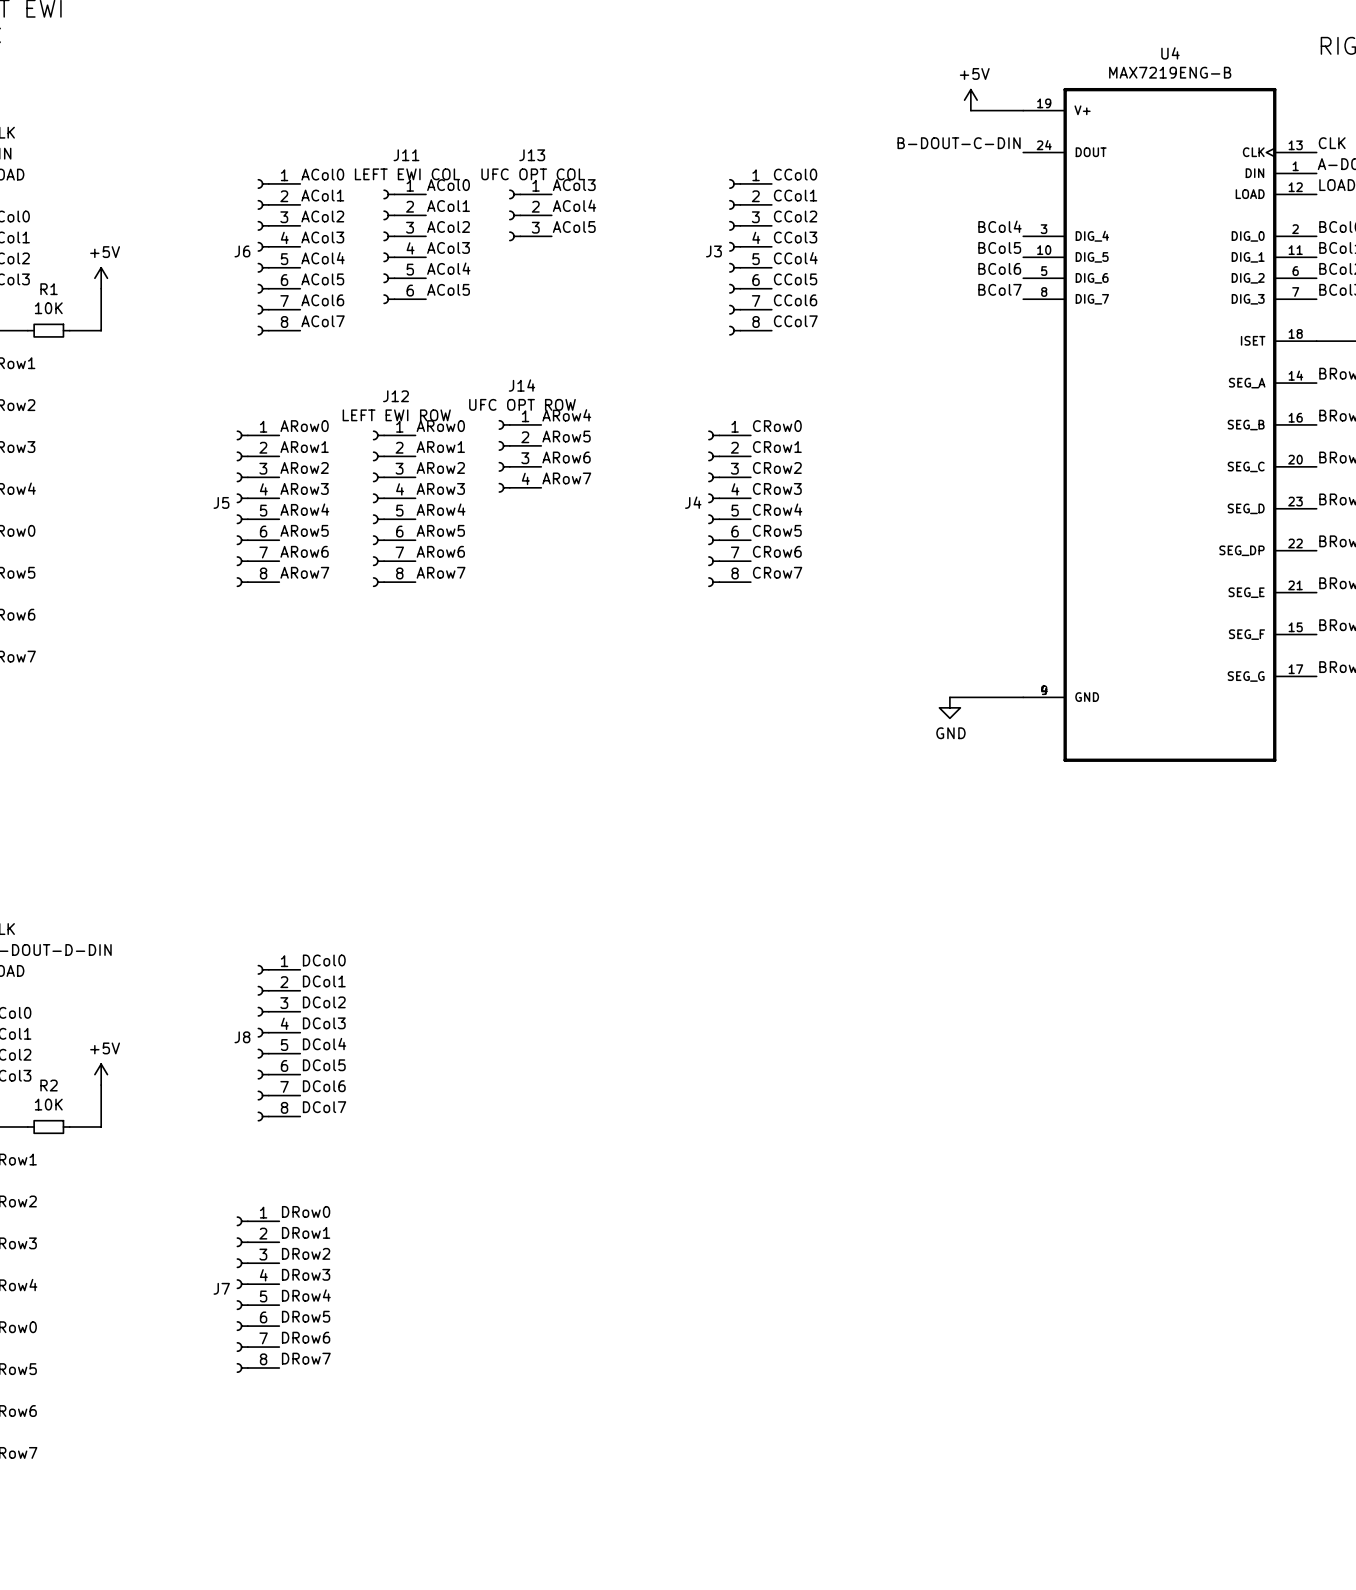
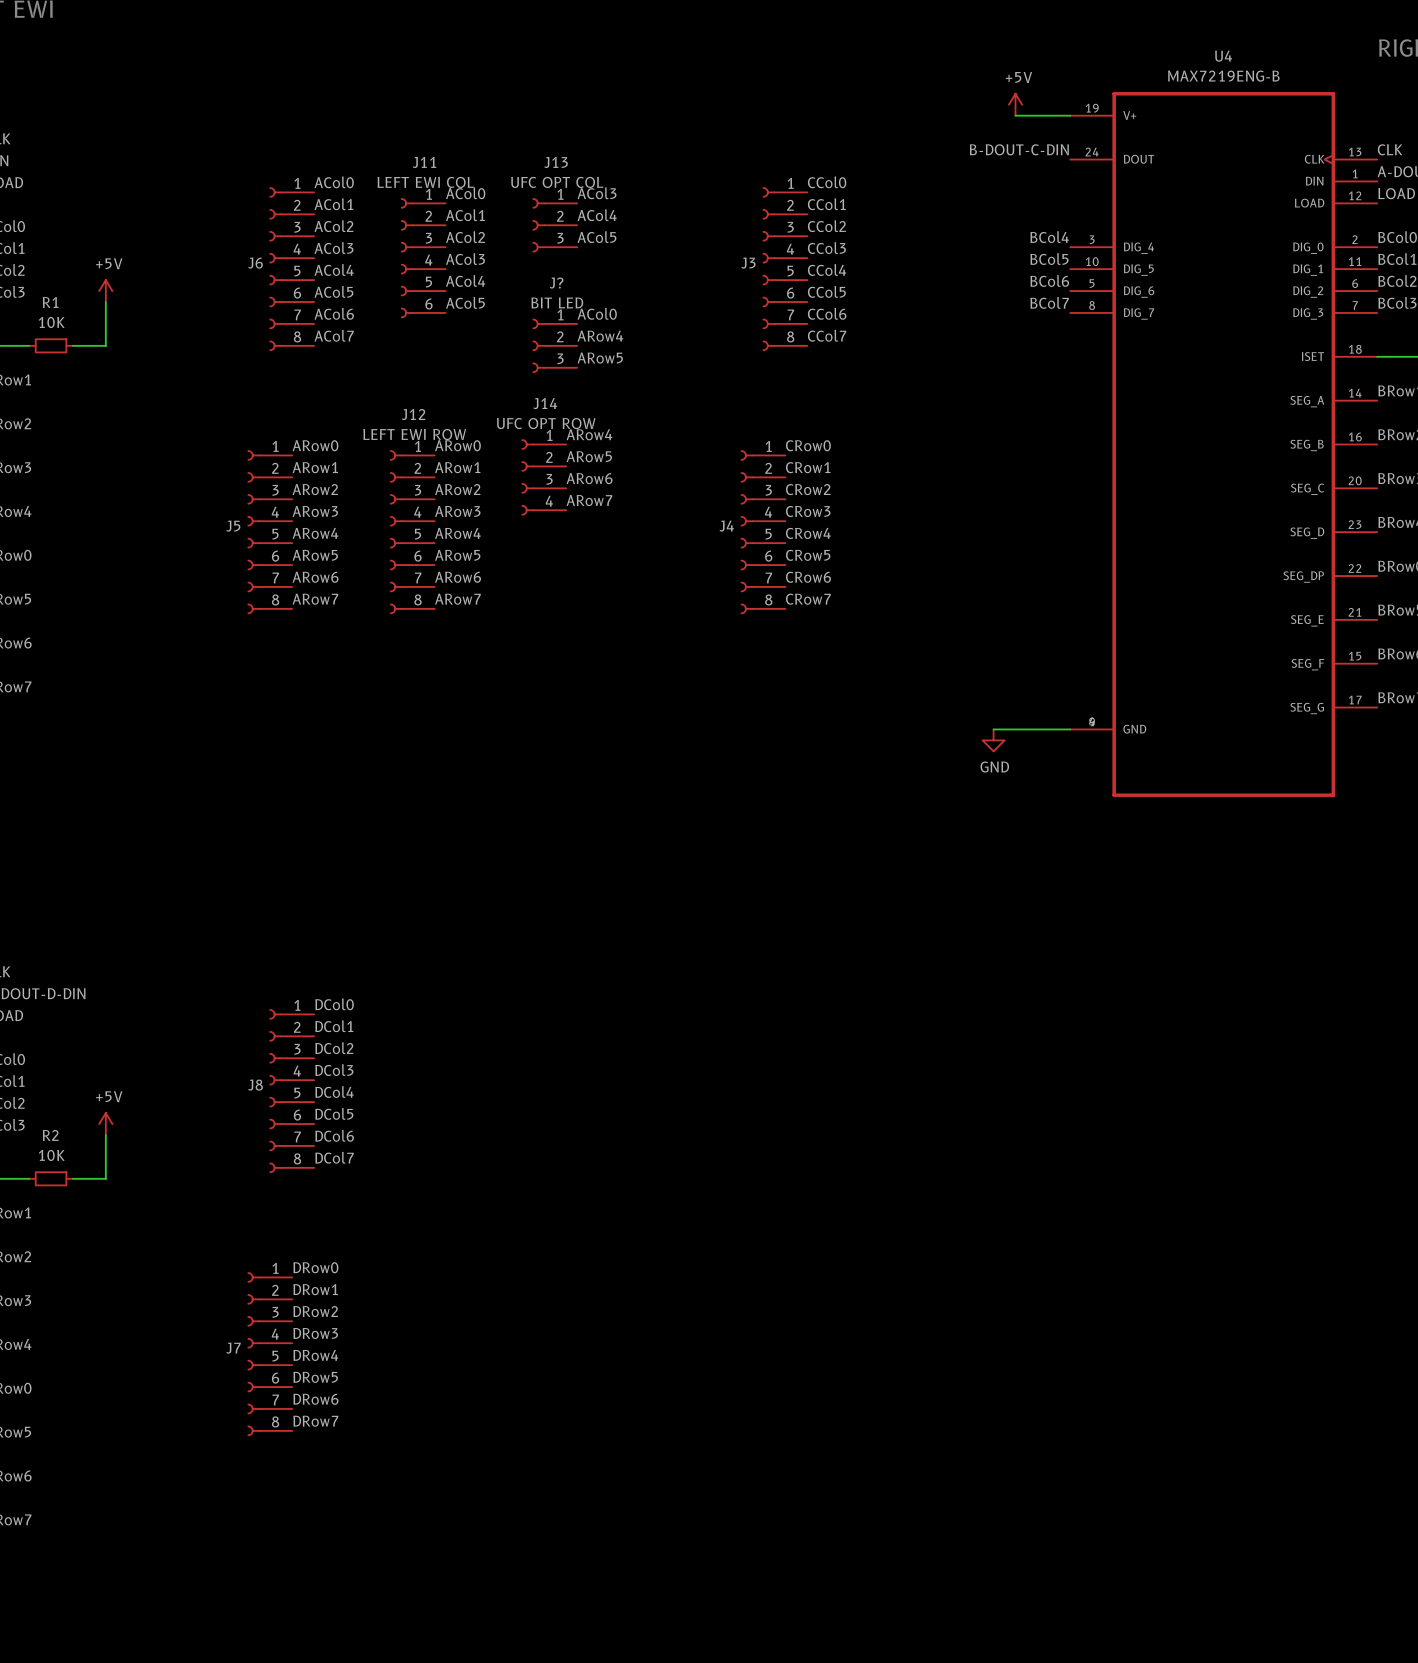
label: none -> ACol0 (597, 313)
label: none -> ARow4 (600, 336)
J?: none -> BIT LED (554, 345)
label: none -> ARow5 (600, 358)

